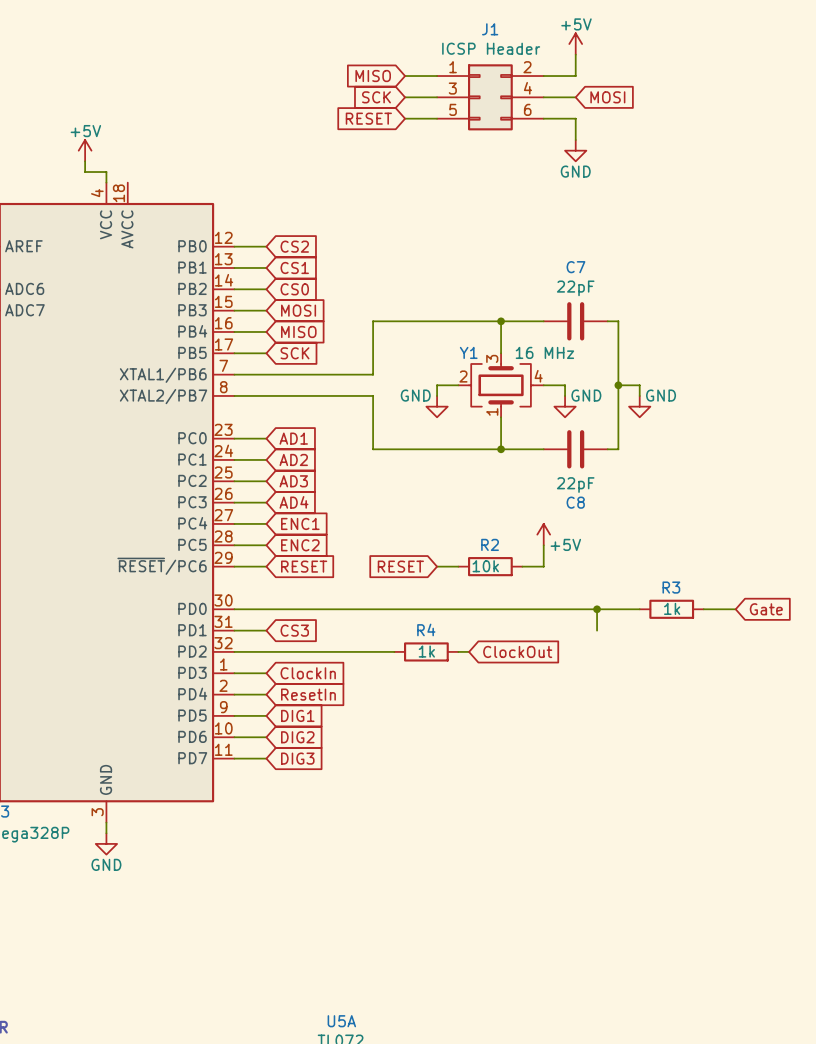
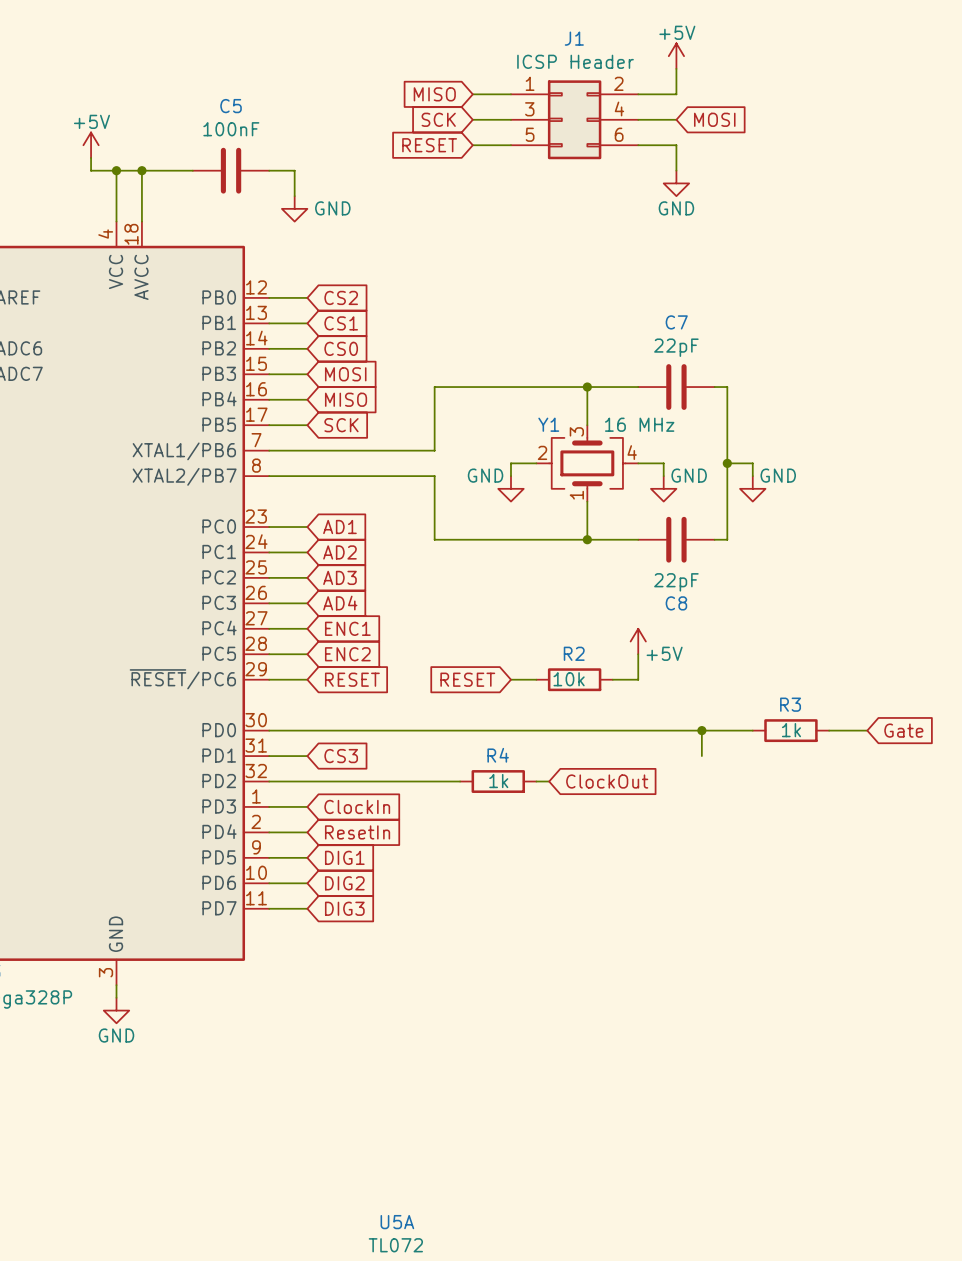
wire: none -> (91, 157) (91, 170) (192, 170)
junction: none -> (116, 170)
wire: none -> (141, 170) (141, 221)
junction: none -> (141, 170)
C5: none -> 100nF (231, 170)
wire: none -> (269, 170) (294, 170) (294, 196)
power symbol position: +5V (85, 150) -> +5V (91, 145)
wire: (85, 161) (85, 172) (106, 172) -> (116, 170) (116, 208)
power symbol: none -> GND (294, 208)

